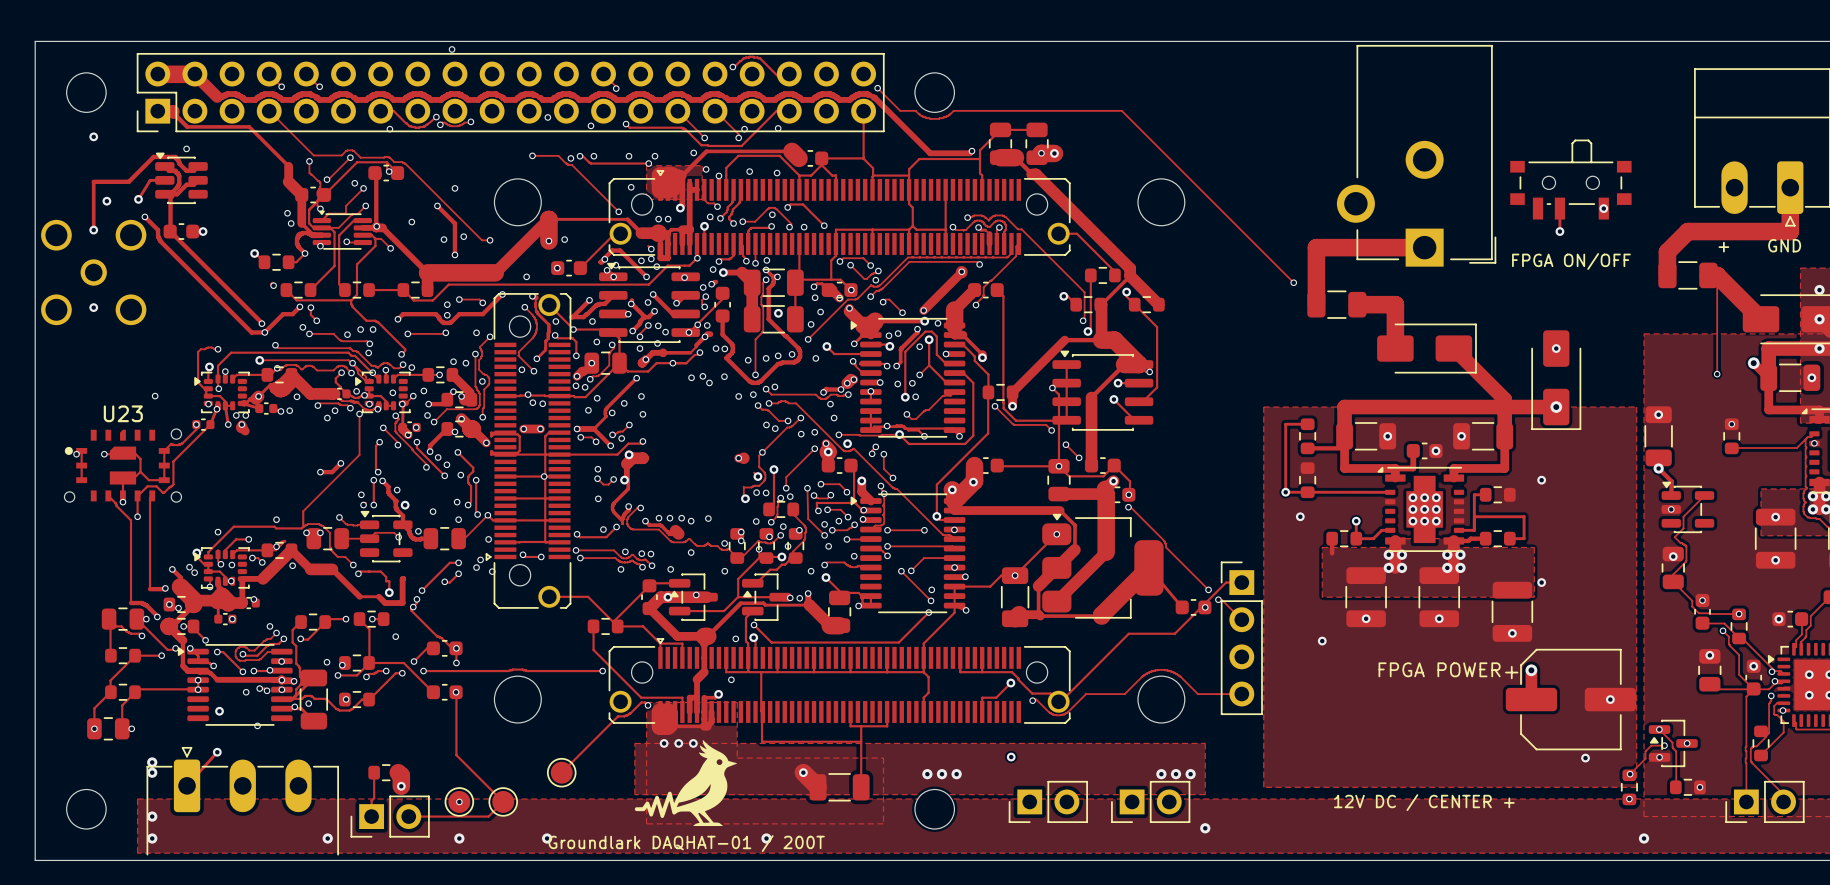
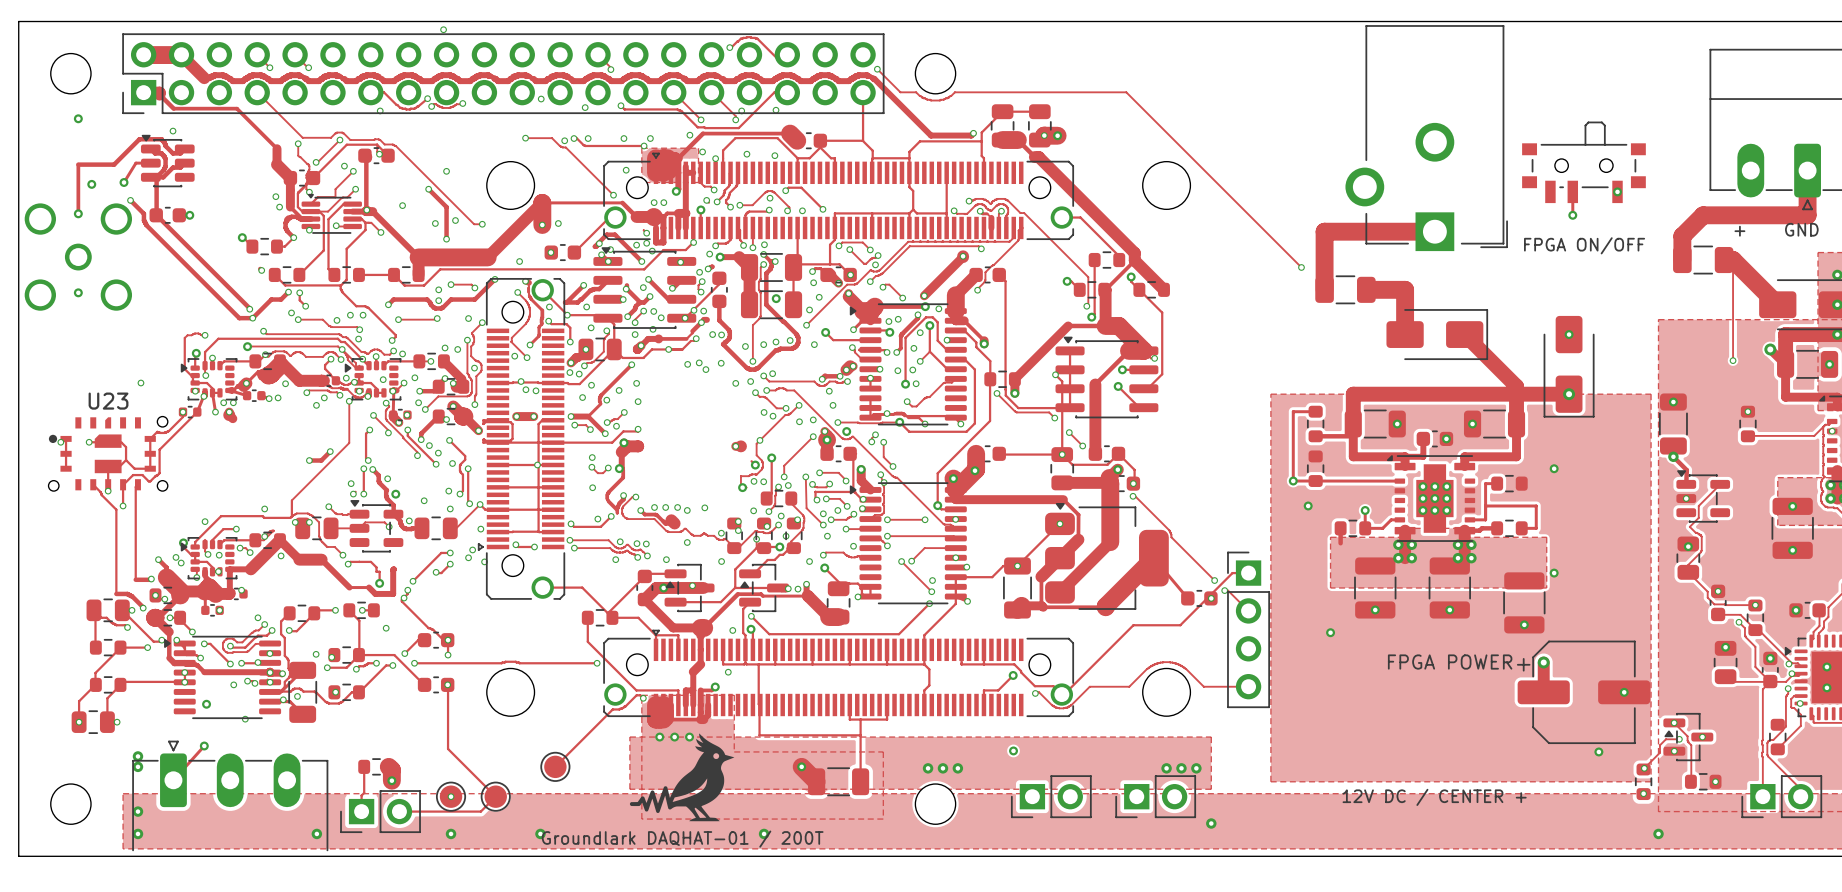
via: none -> (913, 348)

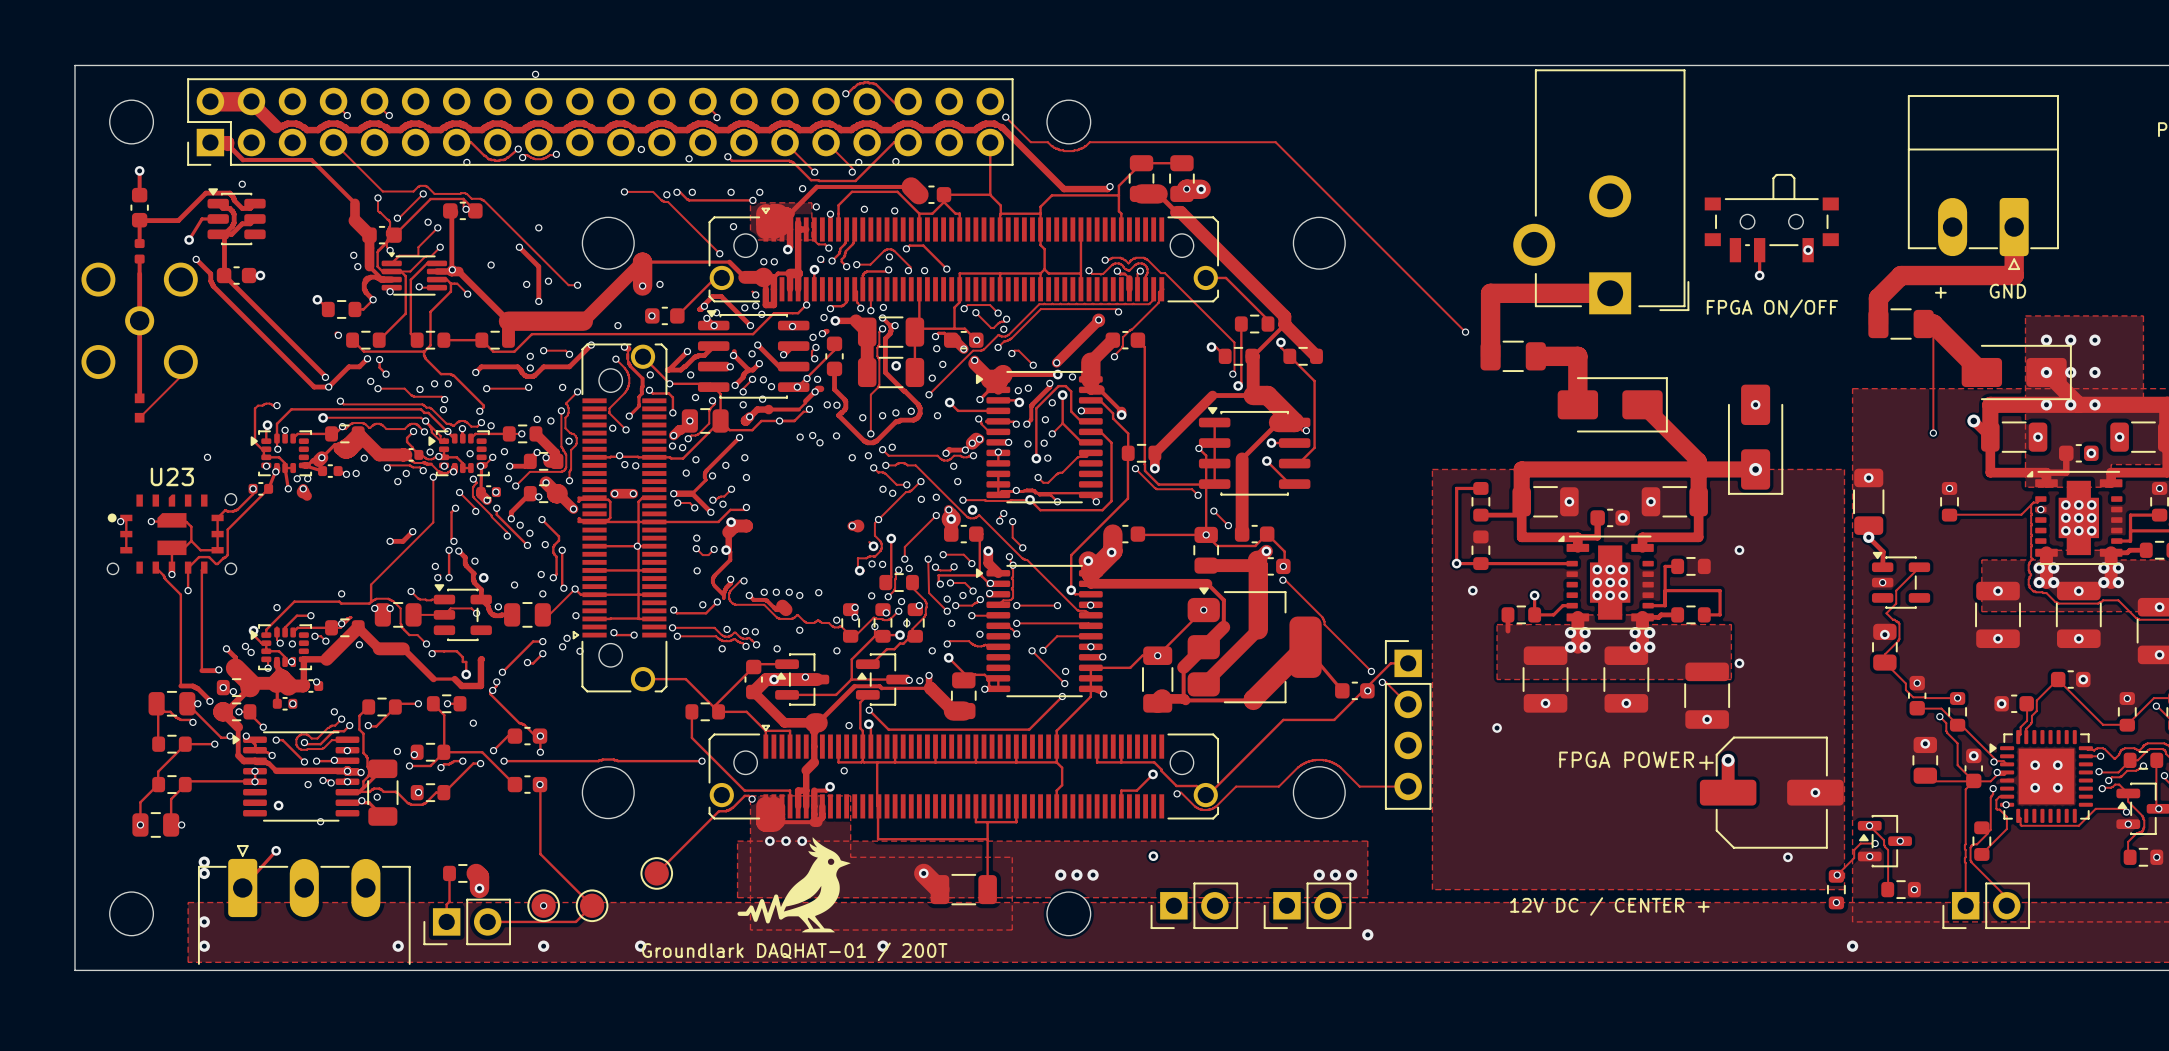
track: none -> (139, 170) (139, 195)
part: none -> (139, 207)
via: (91, 184) -> none
track: (78, 185) (78, 200) -> none
part: none -> (139, 251)
track: none -> (139, 273) (139, 398)
via: (78, 213) -> none
via: (78, 292) -> none
track: none -> (180, 376) (139, 417)
part: none -> (139, 408)

